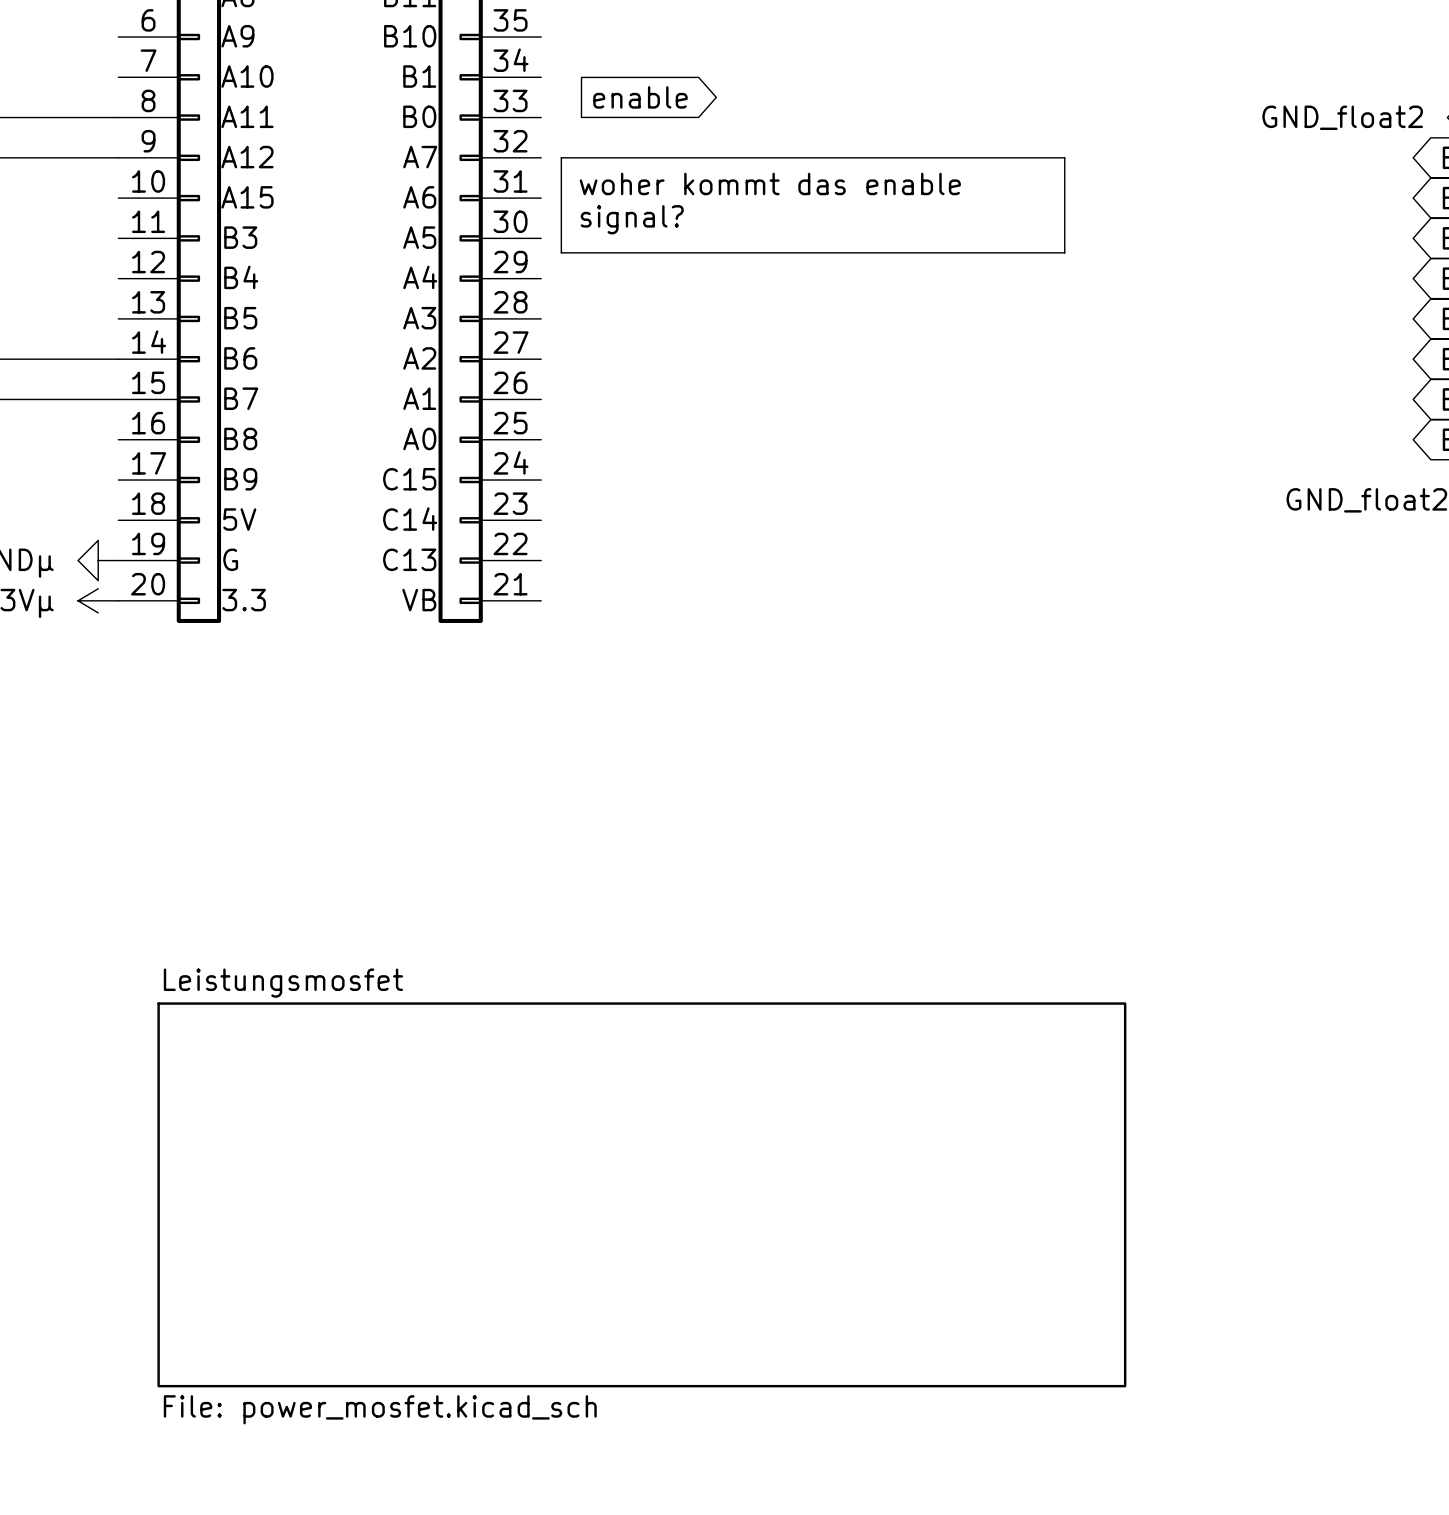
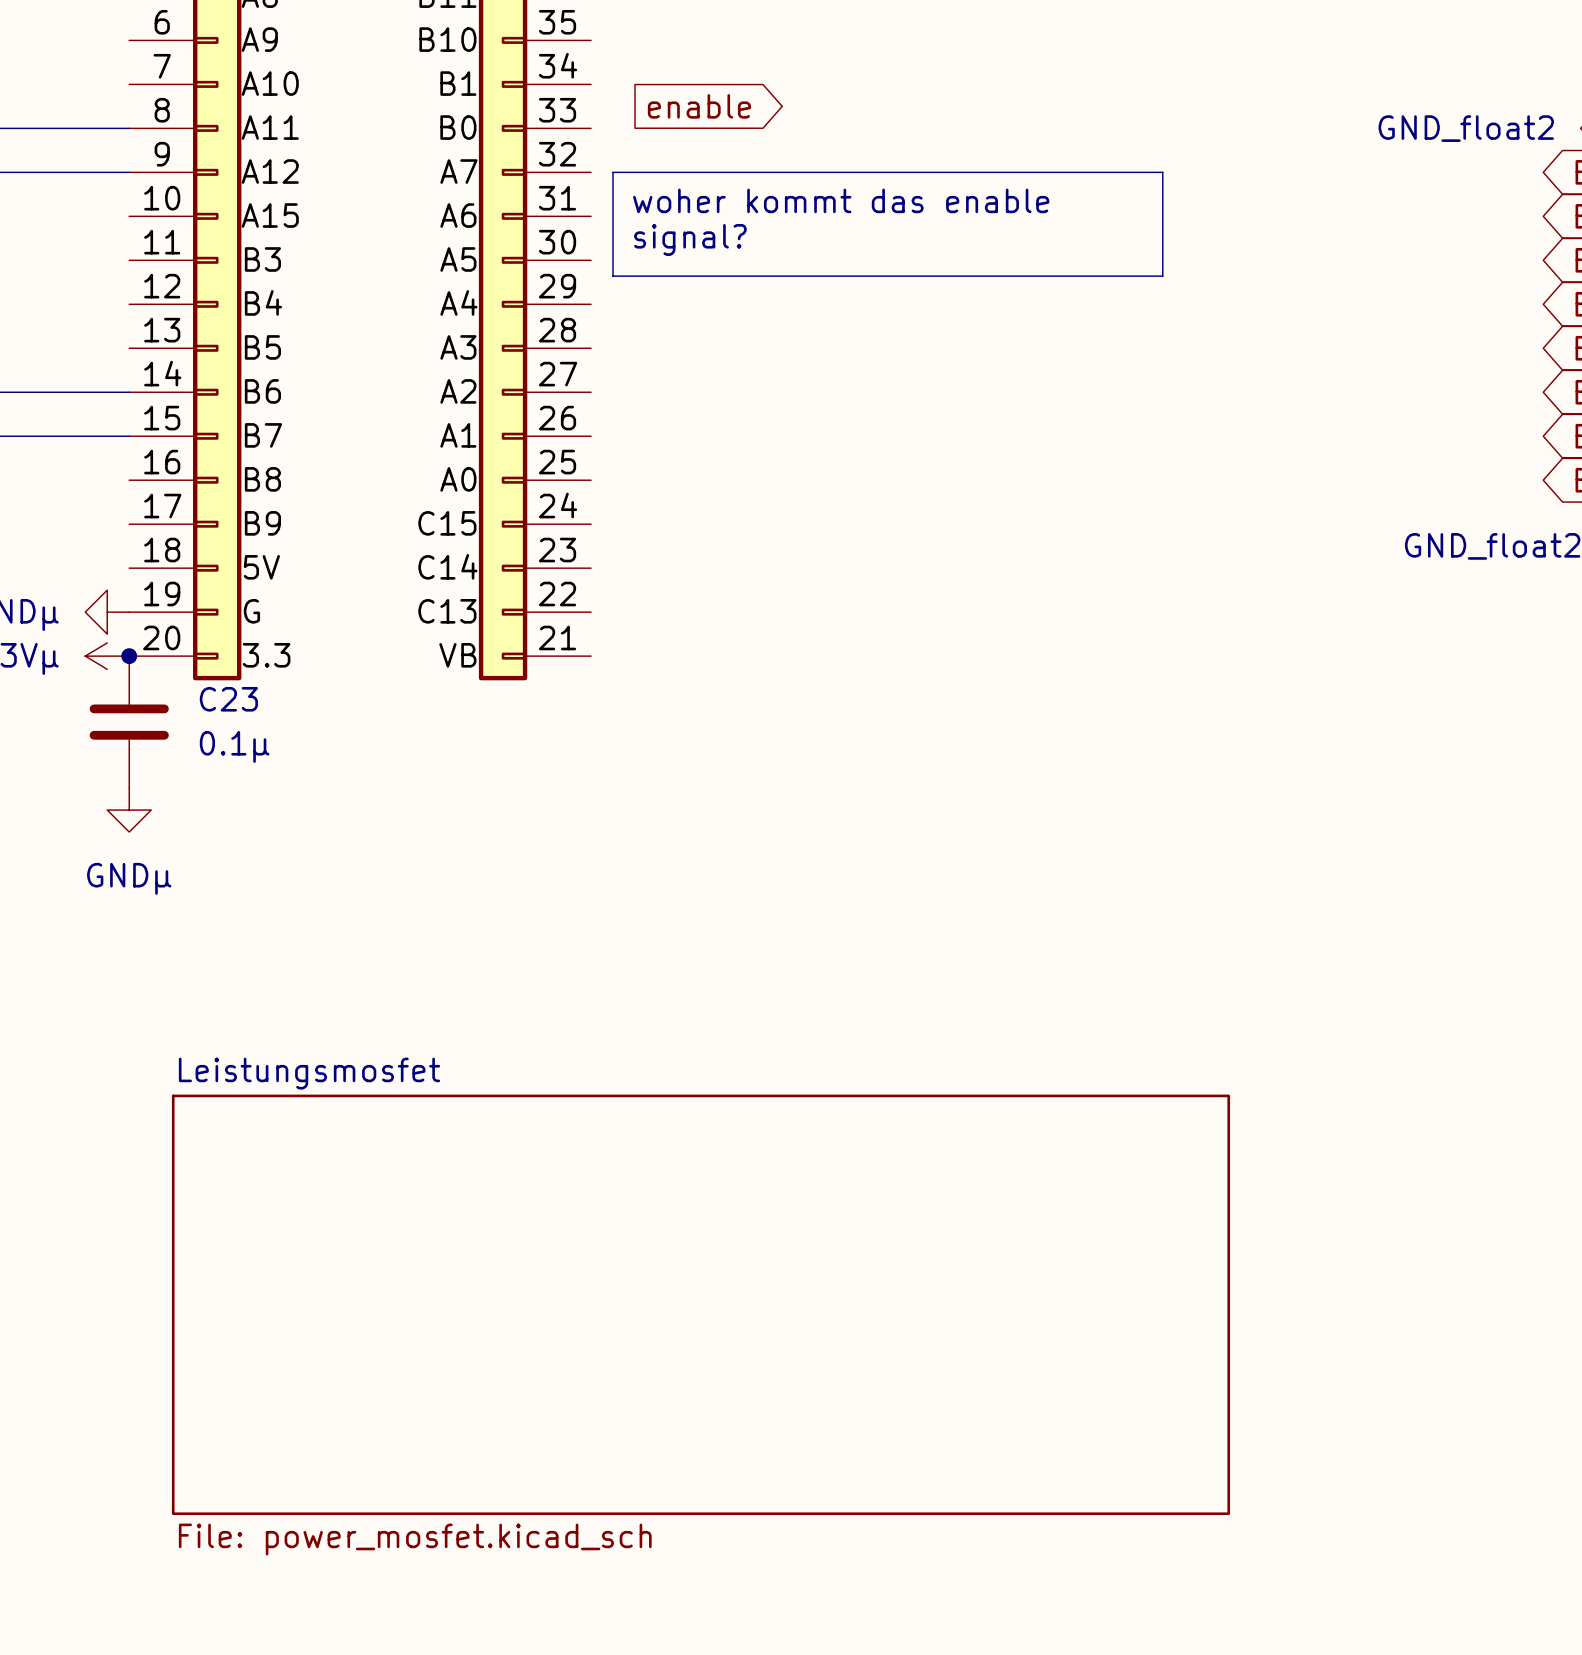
junction: none -> (129, 656)
C23: none -> 0.1µ (129, 722)
power symbol: none -> GNDµ (129, 810)

